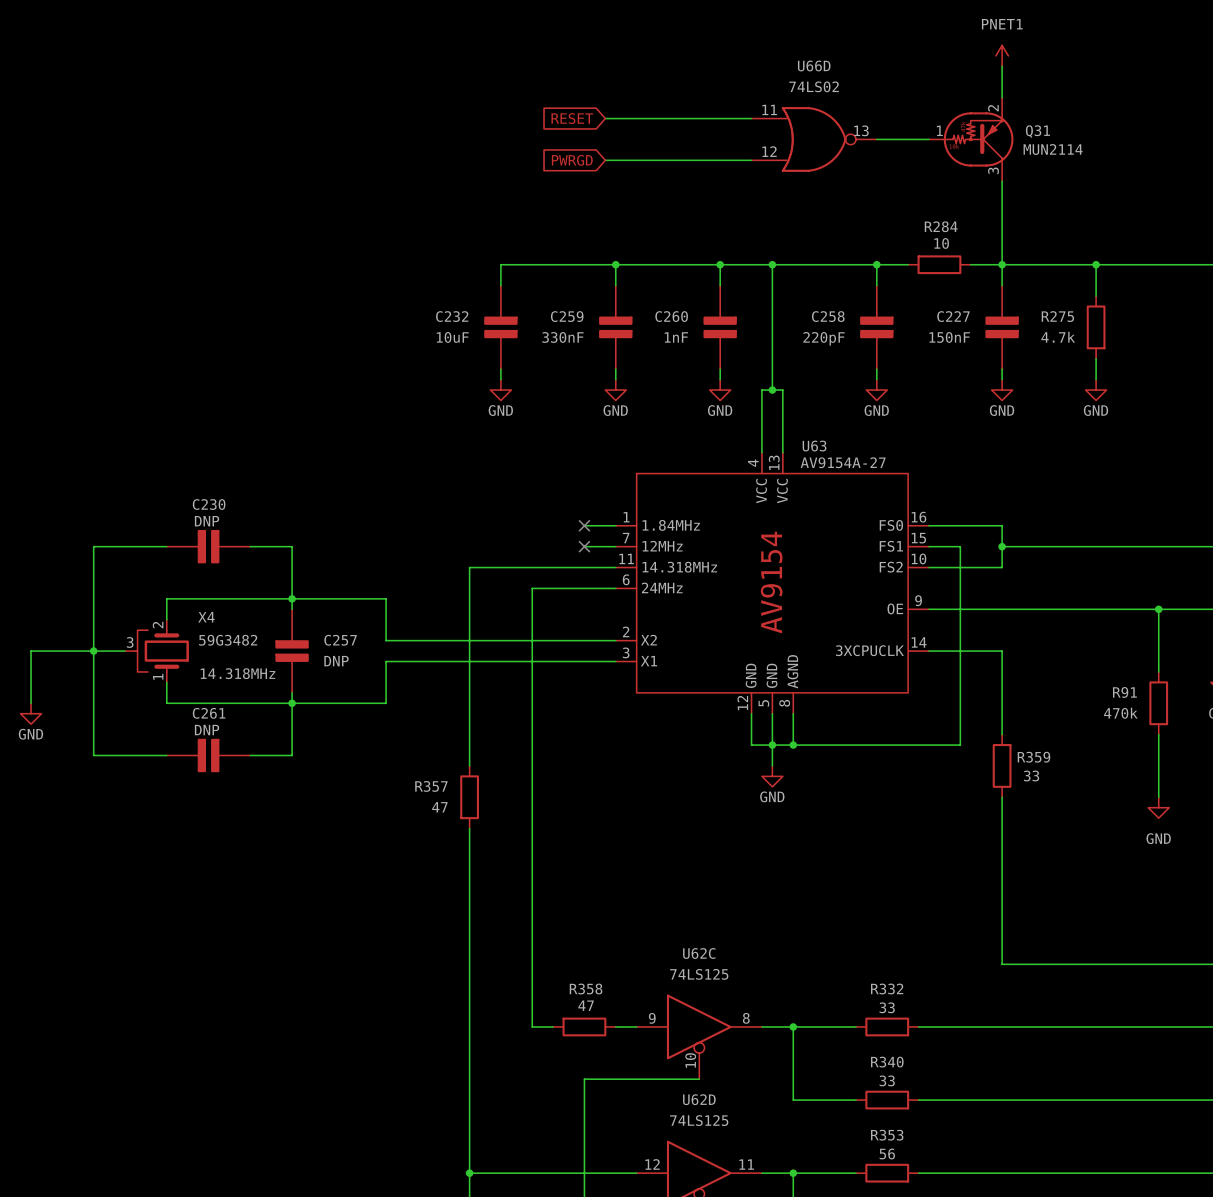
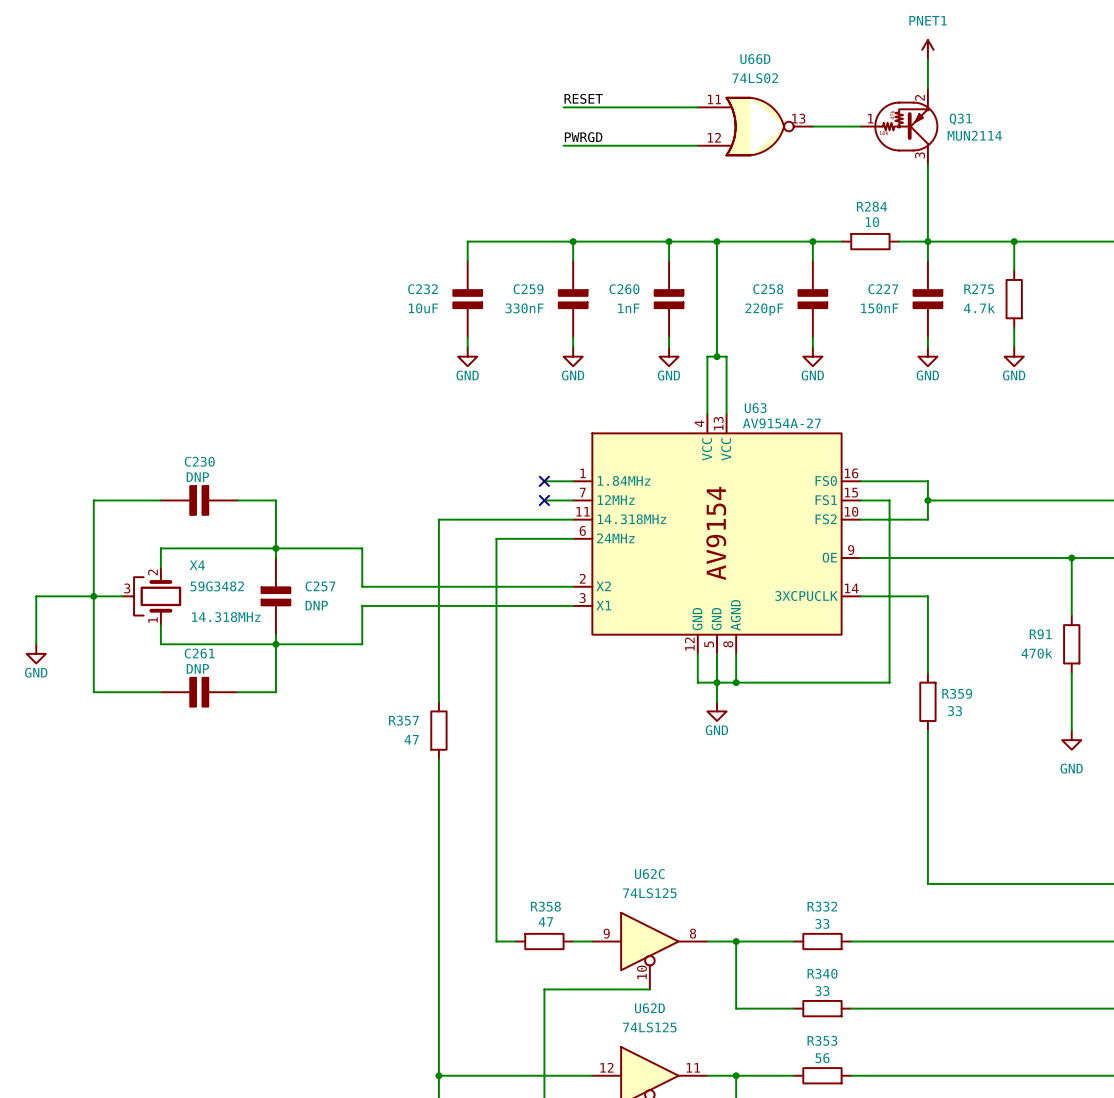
label: none -> RESET (583, 98)
global label: RESET (572, 118) -> none
label: none -> PWRGD (583, 137)
global label: PWRGD (572, 160) -> none

